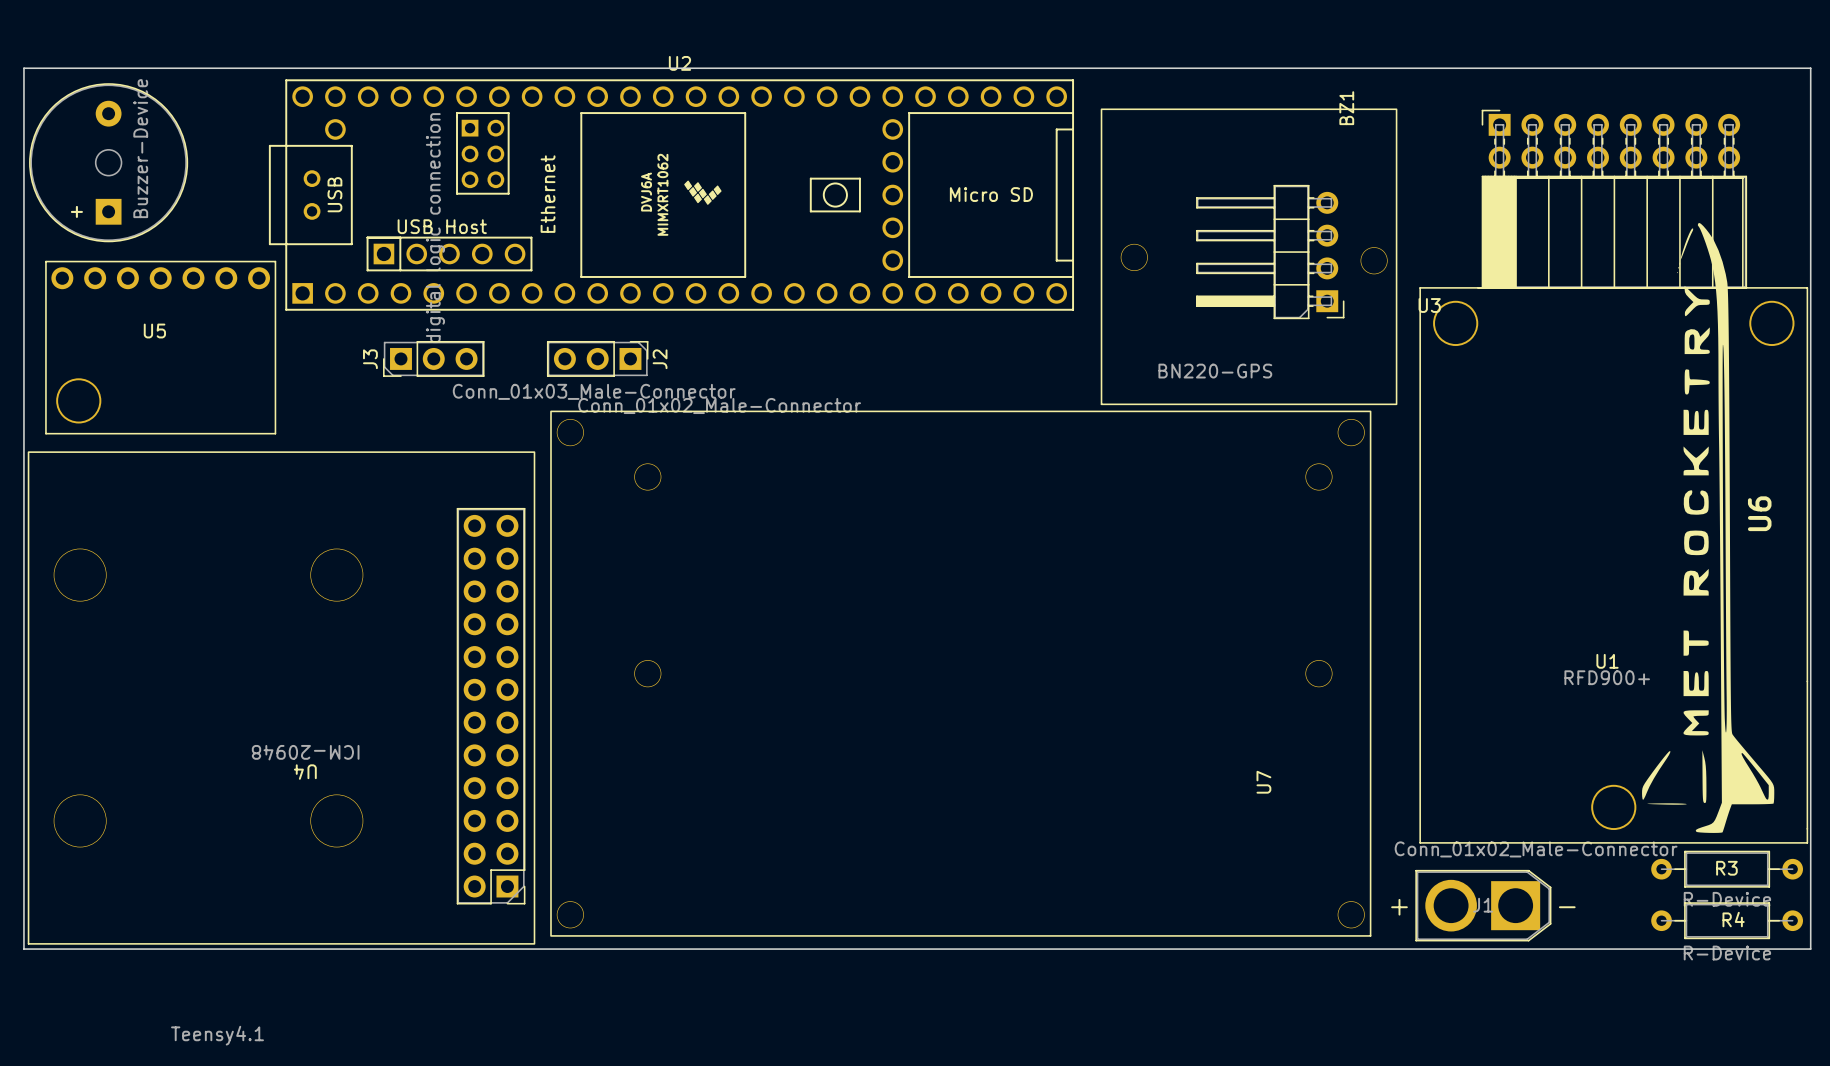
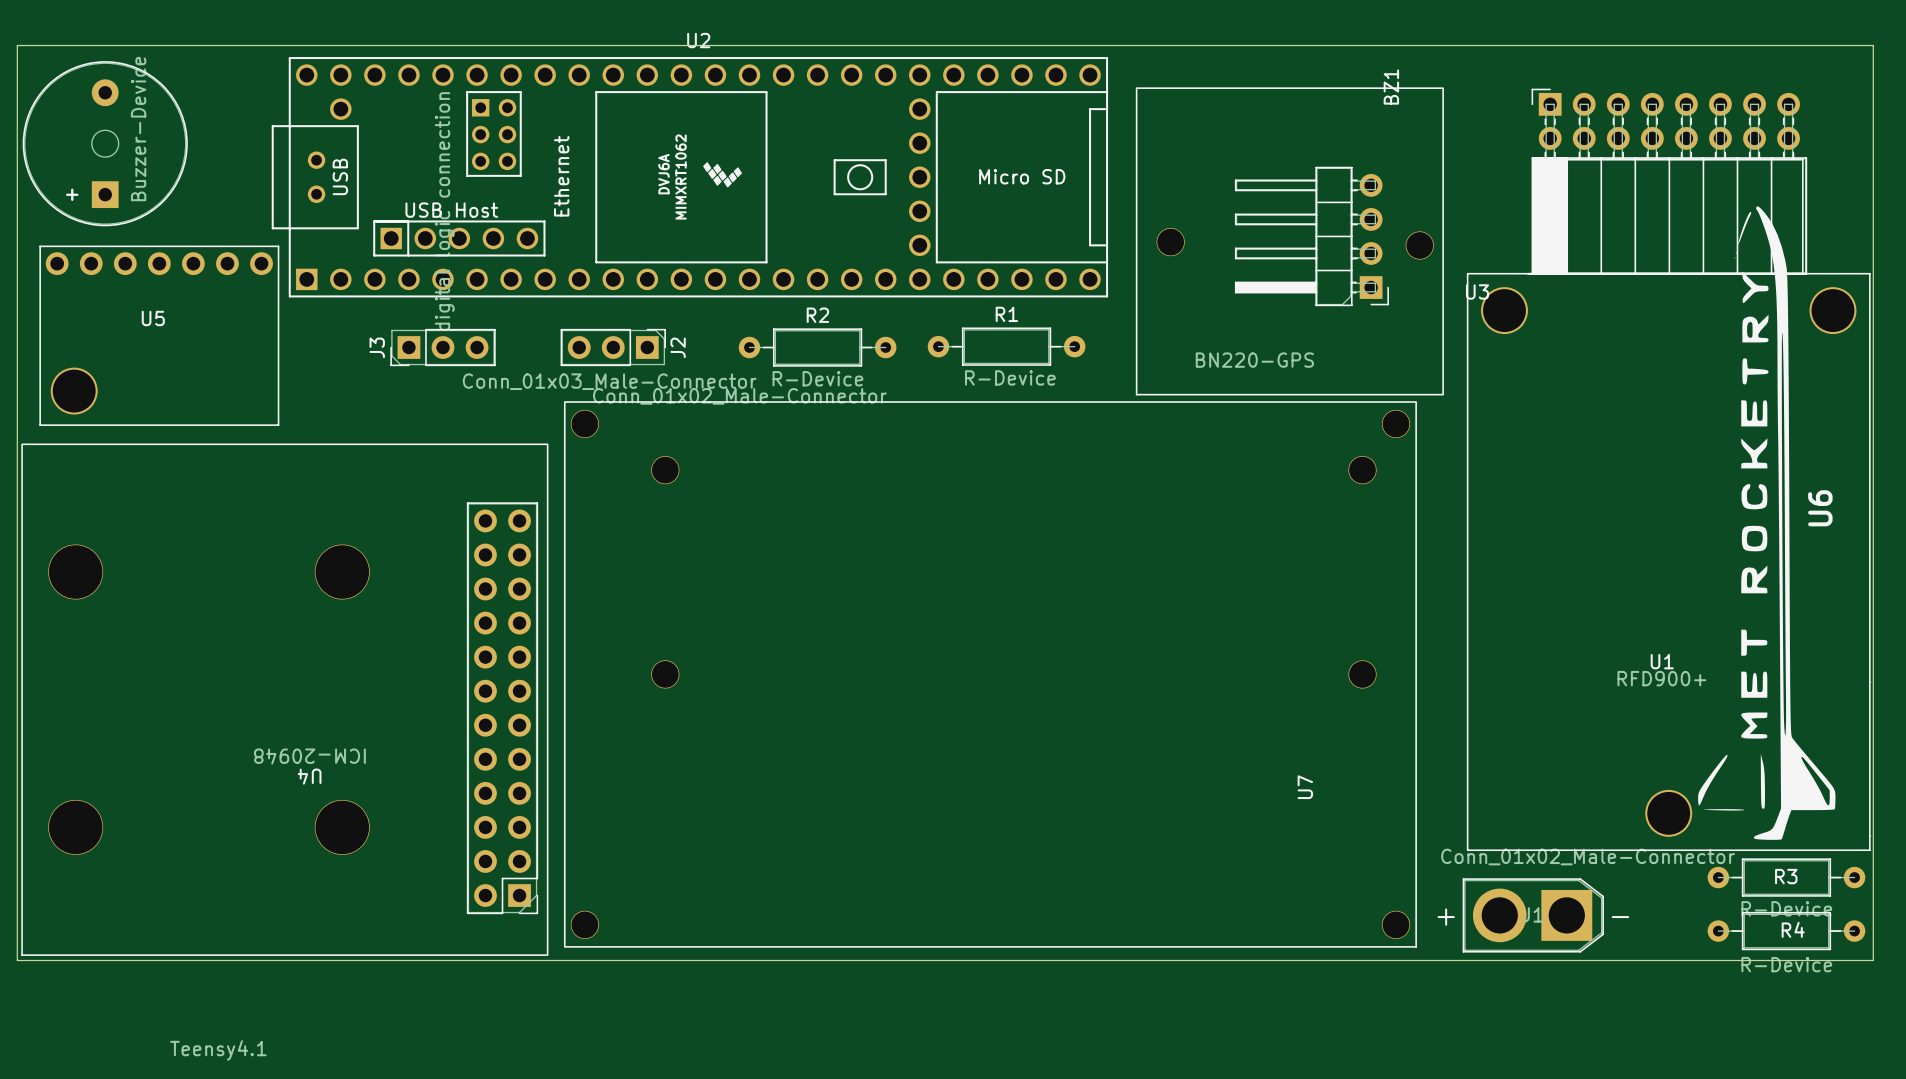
R2: none -> R-Device (817, 347)
R1: none -> R-Device (1006, 346)

